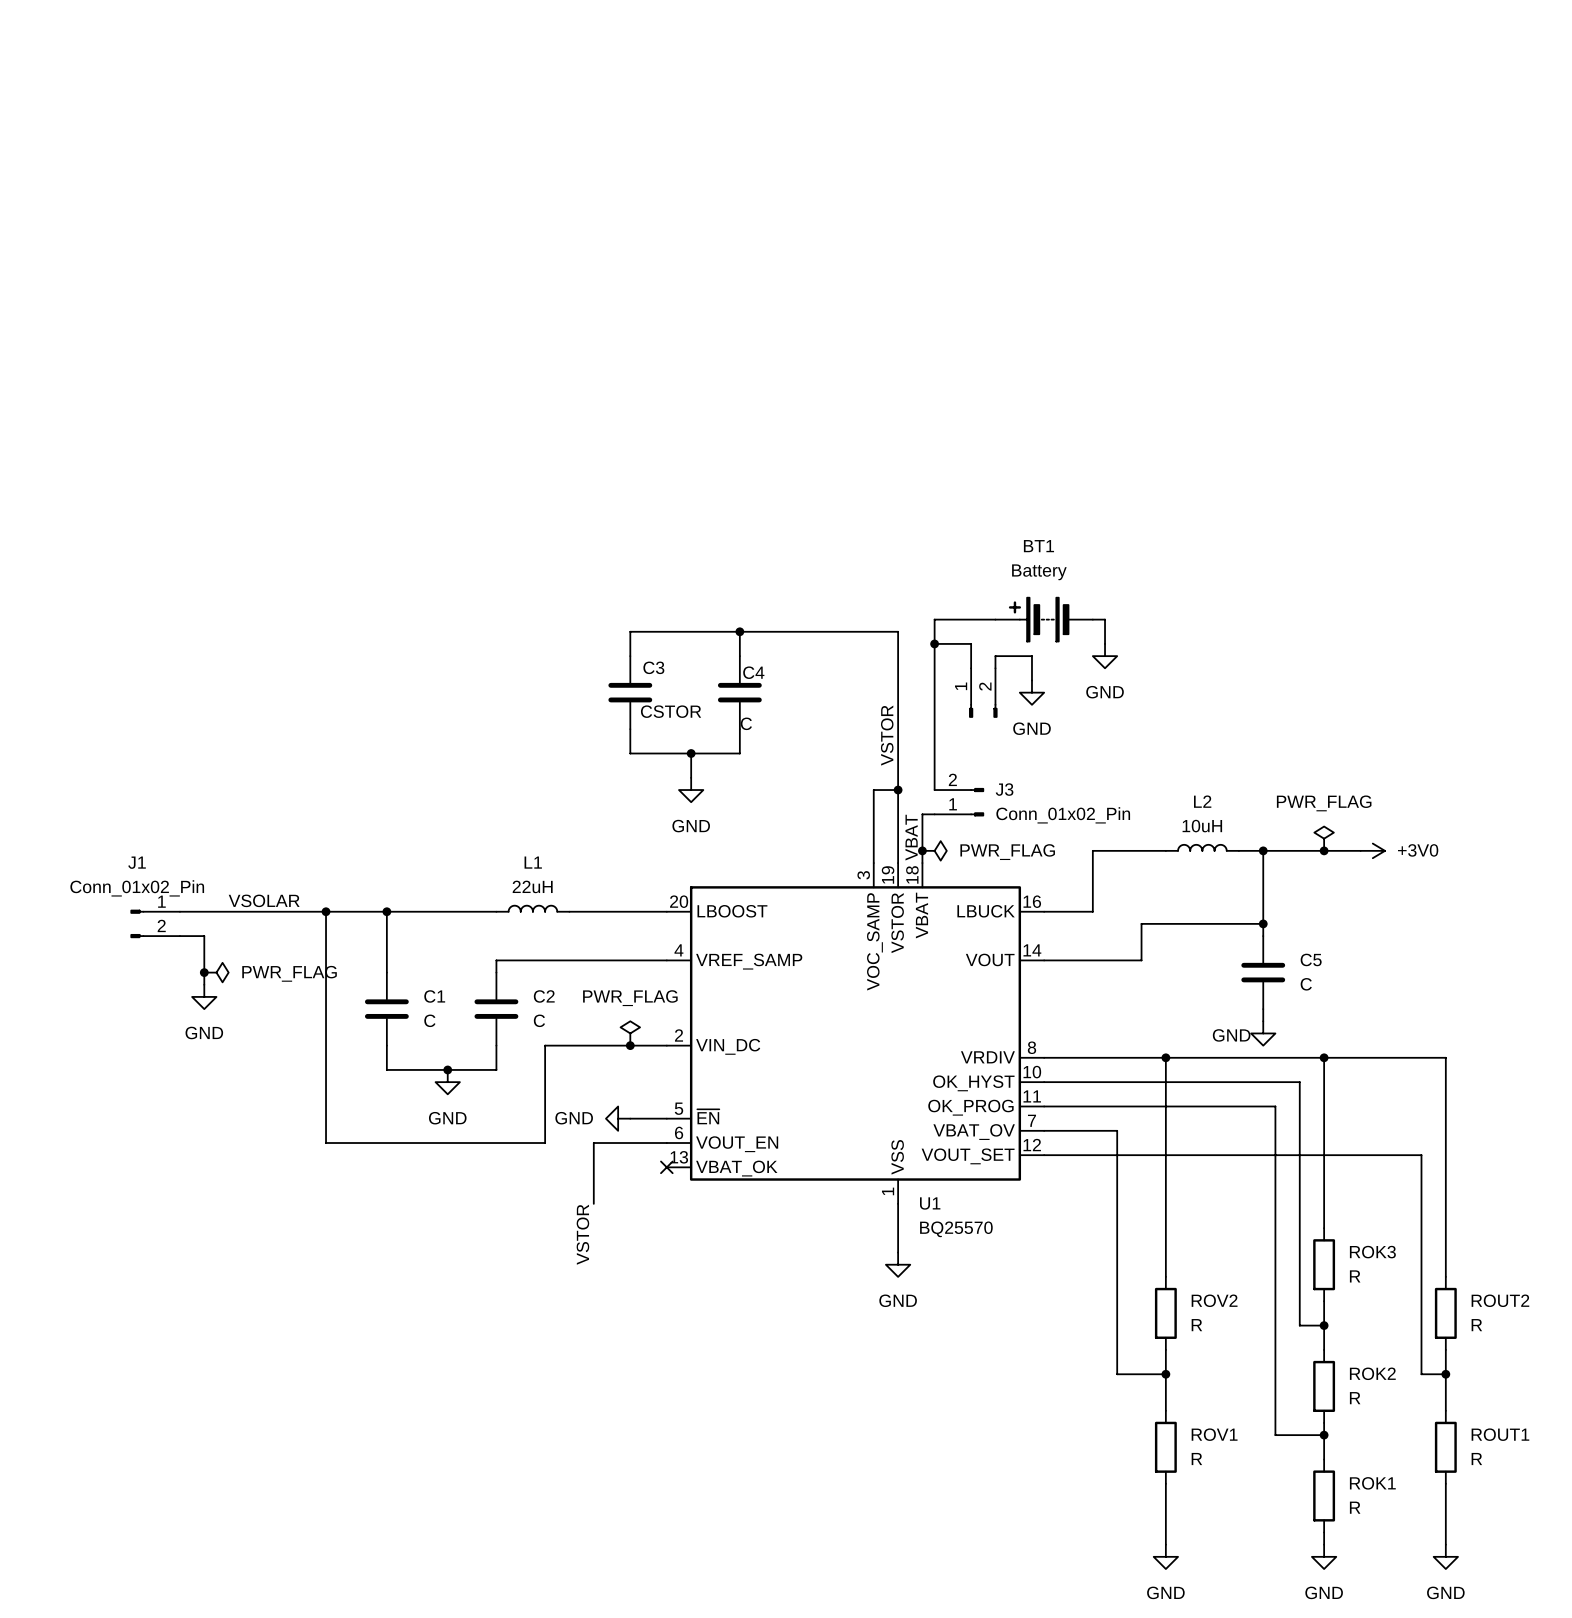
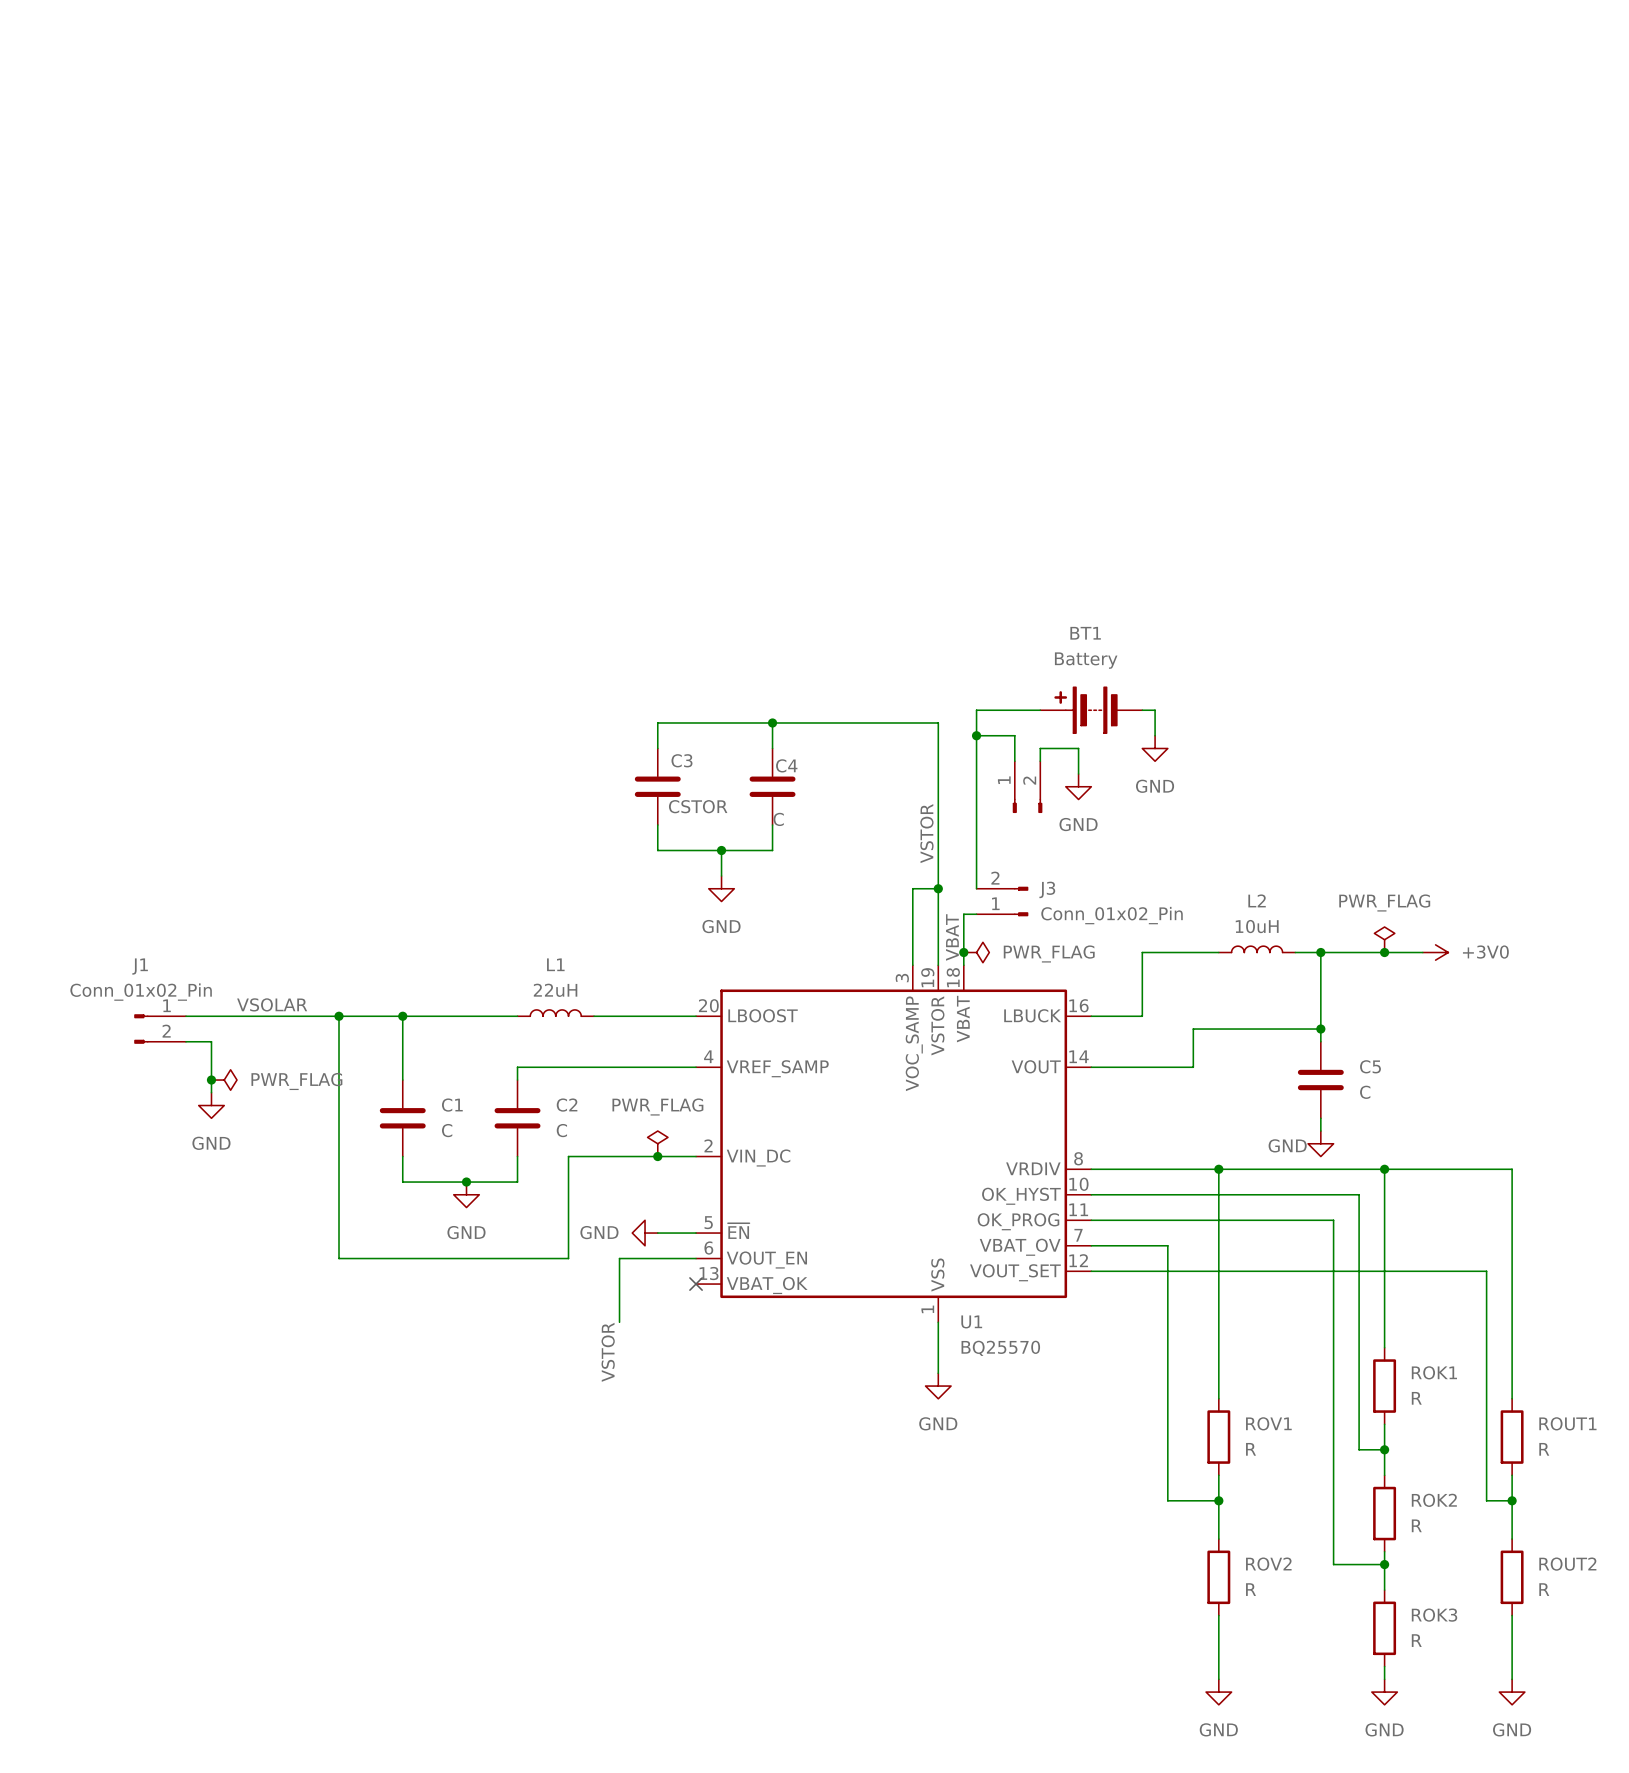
ROK3 name: ROK3 (1372, 1252) -> ROK1 (1434, 1372)
ROV2 name: ROV2 (1214, 1300) -> ROV1 (1268, 1423)
ROUT2 name: ROUT2 (1500, 1300) -> ROUT1 (1567, 1423)
ROV1 name: ROV1 (1214, 1434) -> ROV2 (1268, 1564)
ROUT1 name: ROUT1 (1500, 1434) -> ROUT2 (1567, 1564)
ROK1 name: ROK1 (1372, 1483) -> ROK3 (1434, 1615)

